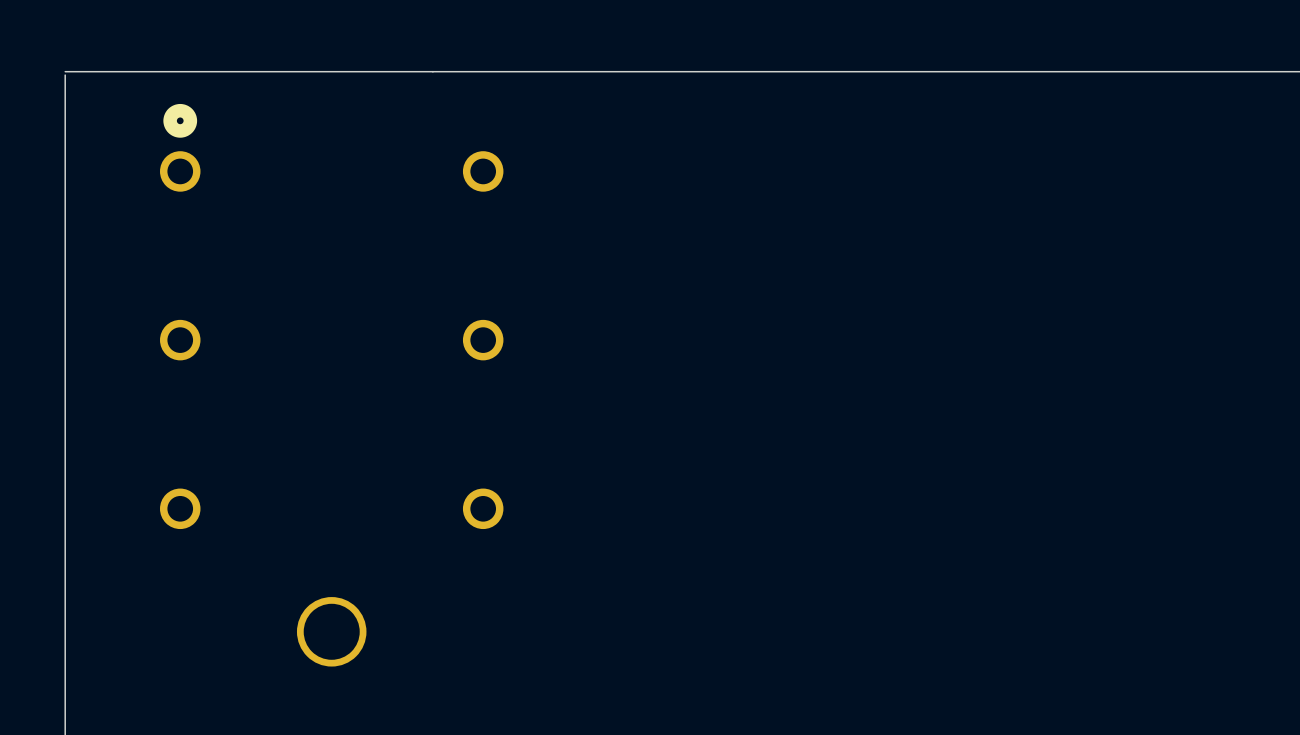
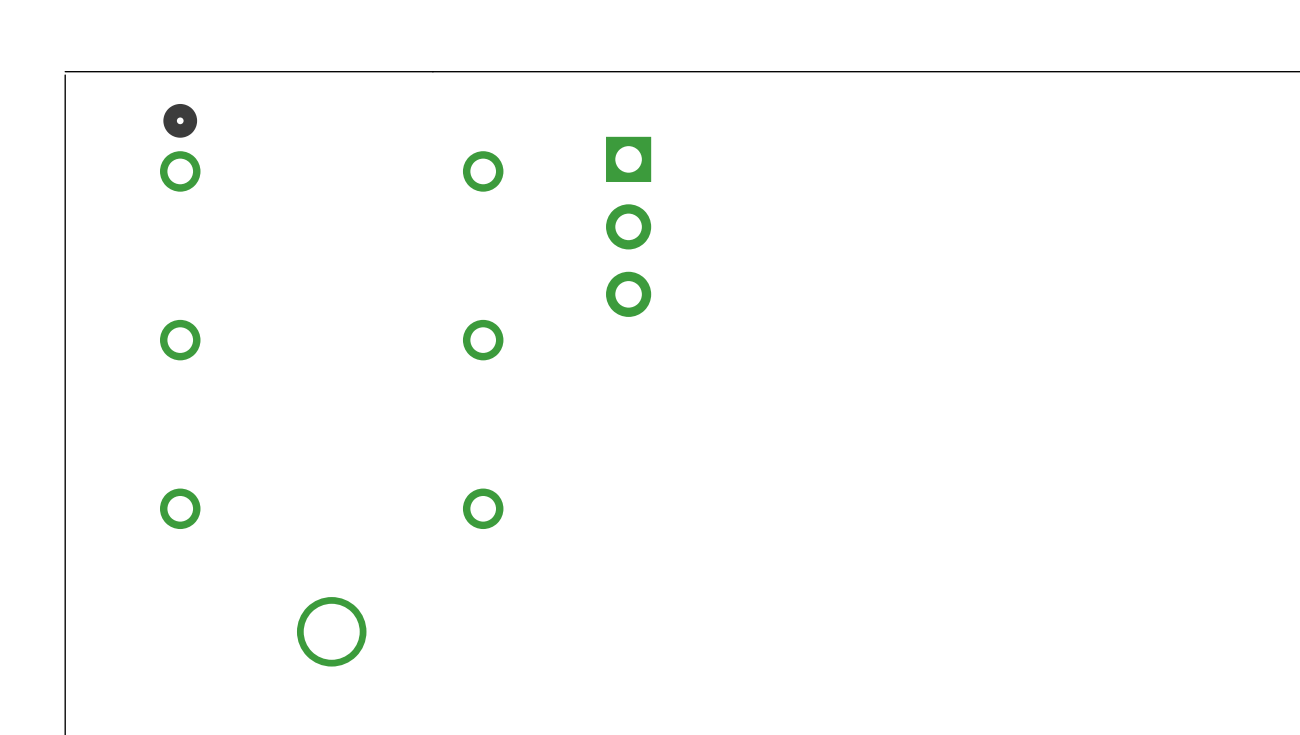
part: none -> (628, 226)

